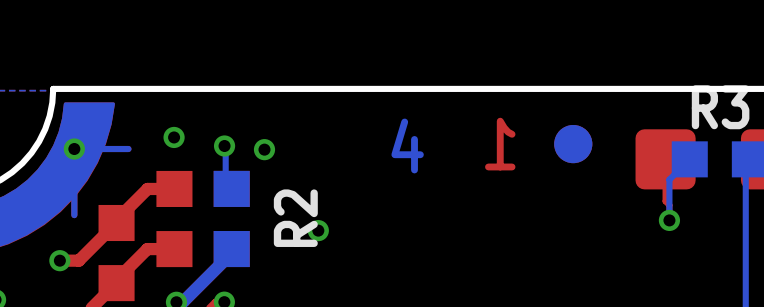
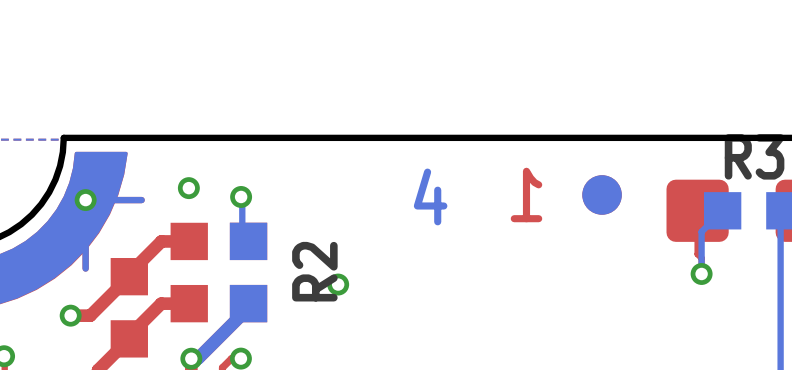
via: (264, 149) -> none

